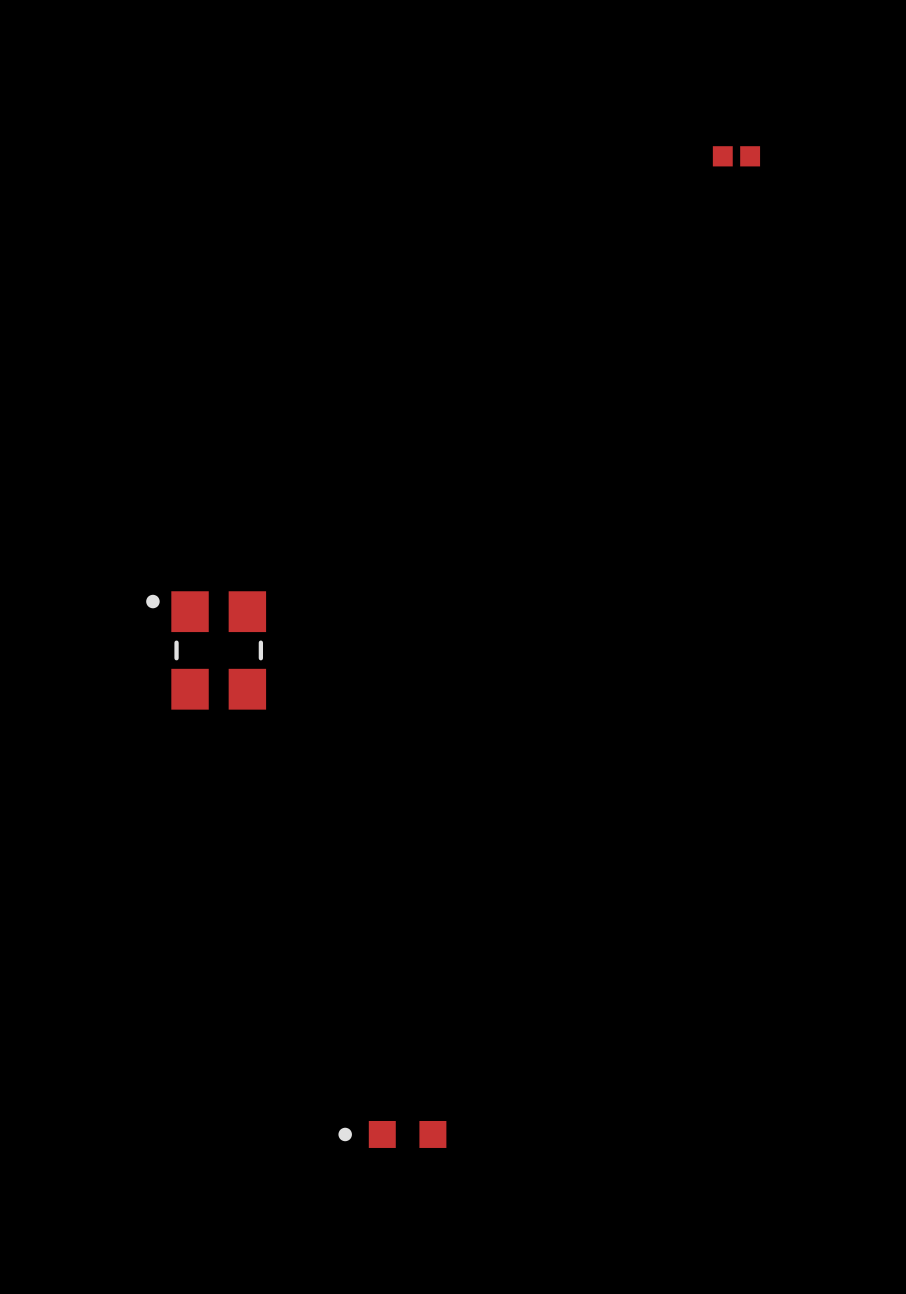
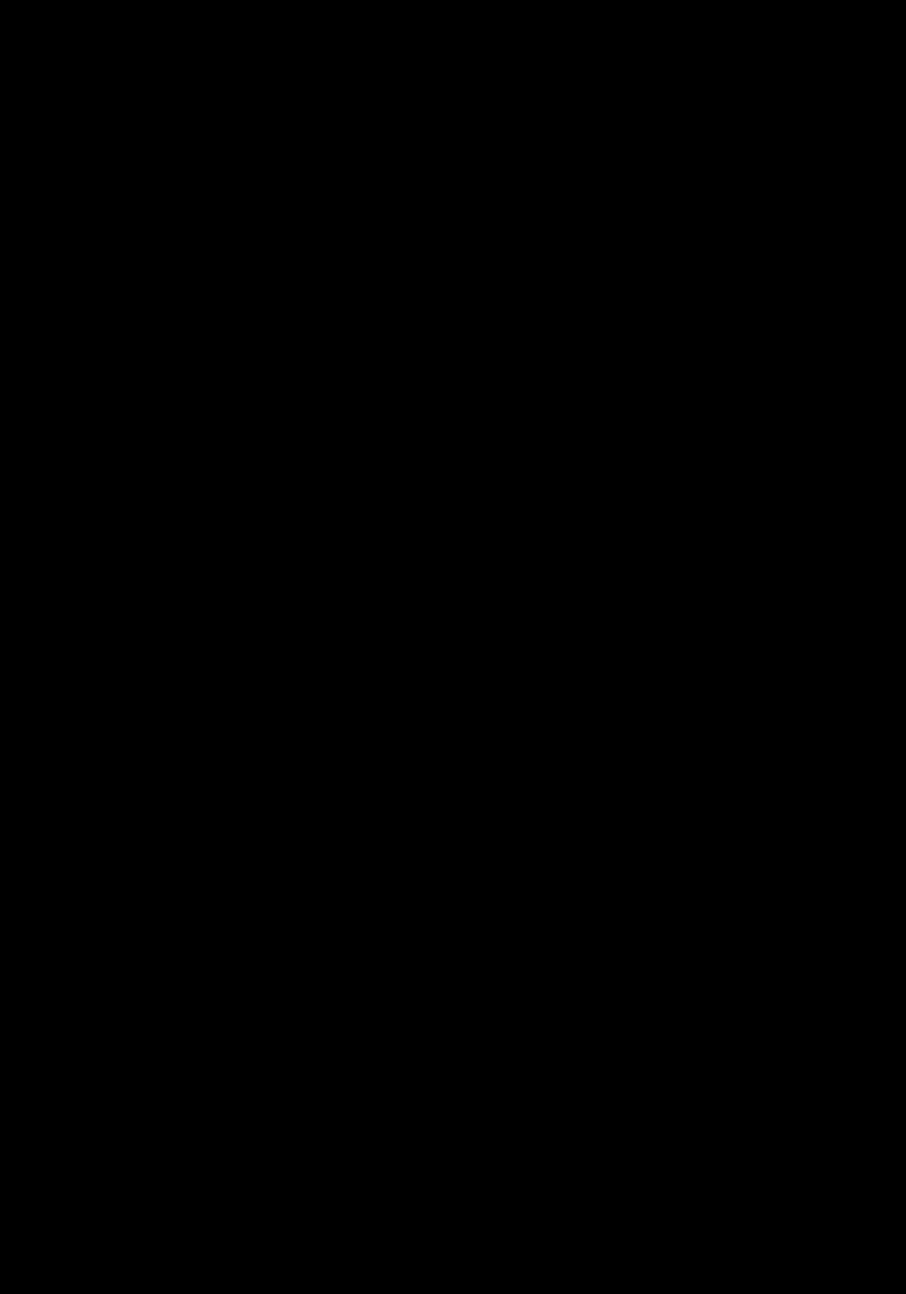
part: (736, 156) -> none
part: (206, 650) -> none
part: (392, 1134) -> none

